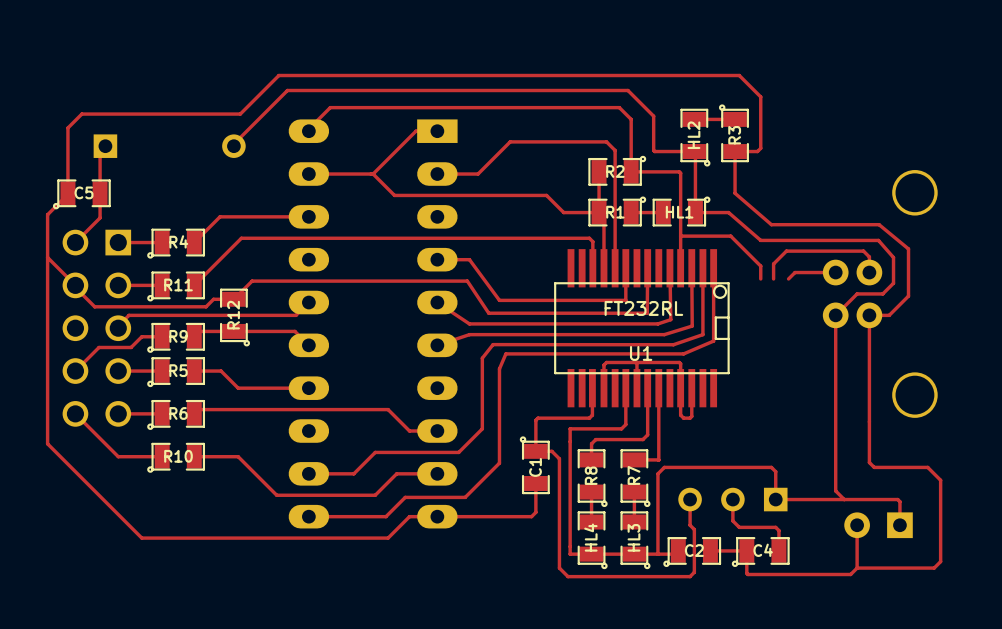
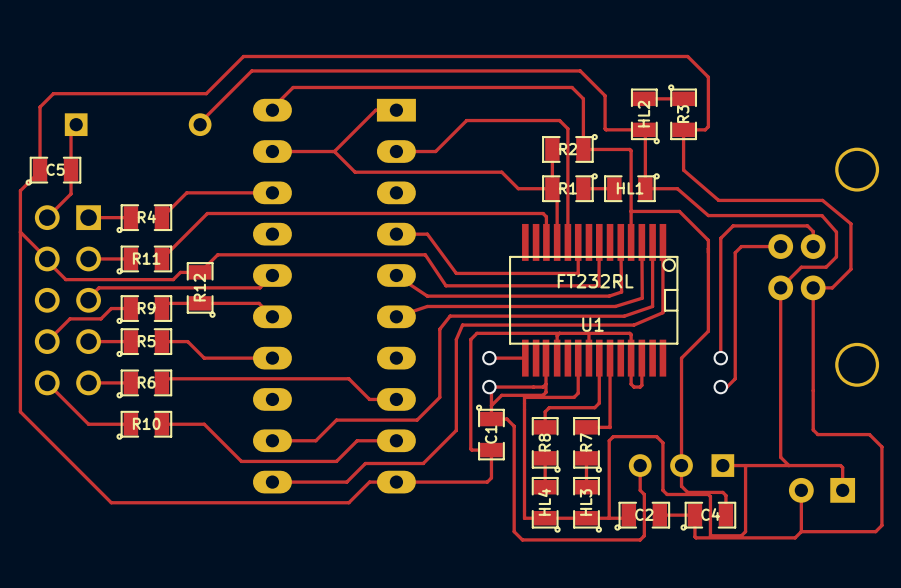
track: none -> (708, 252) (708, 331) (681, 358) (681, 465)
track: none -> (720, 252) (720, 358)
track: none -> (735, 252) (735, 378) (726, 387) (720, 387)
track: none -> (559, 333) (476, 333) (470, 339) (470, 449) (491, 450)
track: none -> (489, 358) (525, 358)
via: none -> (489, 358)
via: none -> (720, 358)
track: none -> (545, 384) (545, 392) (543, 395) (501, 395) (491, 405)
via: none -> (489, 387)
via: none -> (720, 387)
track: (662, 469) (664, 467) (771, 467) (775, 471) (775, 499) -> (613, 436) (656, 436) (662, 442) (662, 490) (667, 494) (708, 494) (710, 496) (710, 535) (741, 535) (745, 531) (745, 465)

